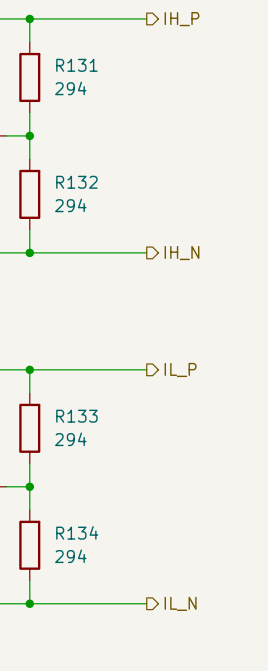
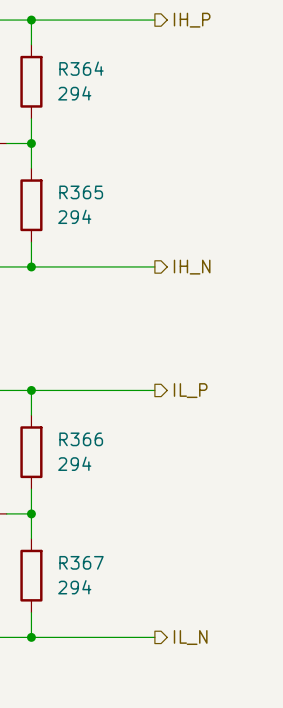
R131 name: R131 (76, 65) -> R364 (81, 68)
R132 name: R132 (76, 182) -> R365 (81, 192)
R133 name: R133 (76, 416) -> R366 (81, 439)
R134 name: R134 (77, 532) -> R367 (81, 562)

